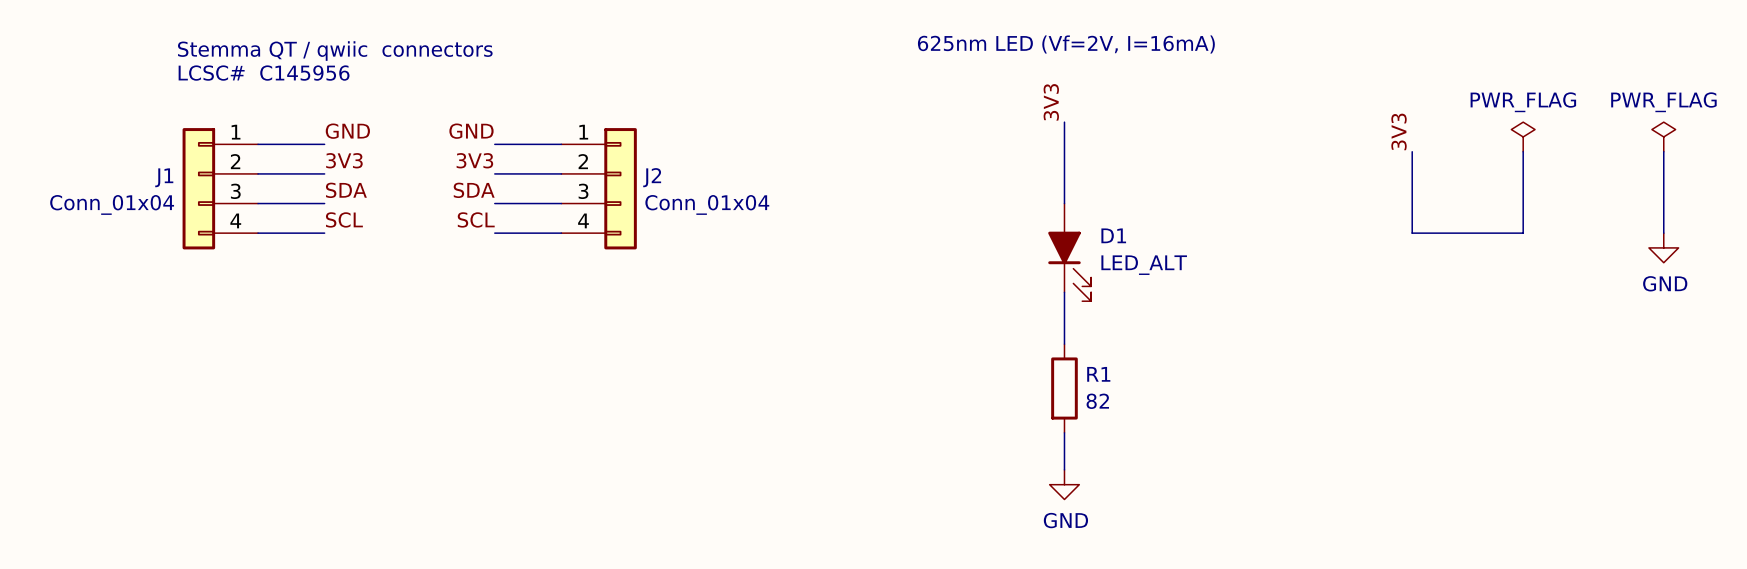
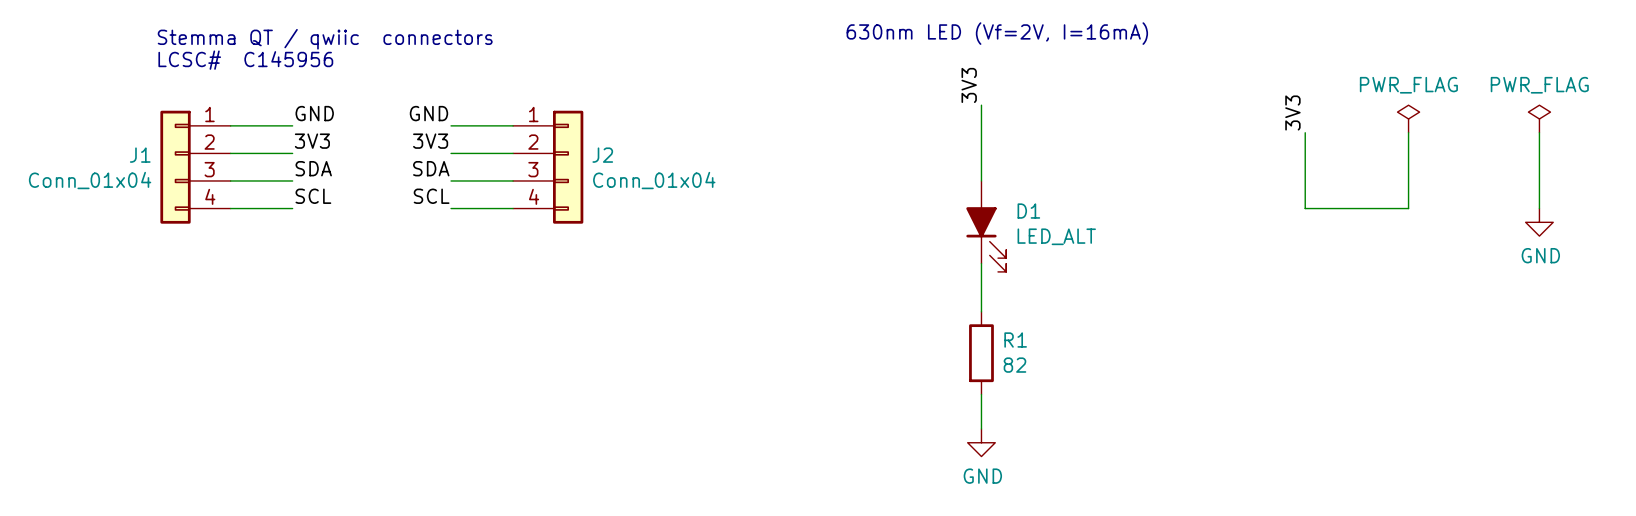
text: 625nm LED (Vf=2V, I=16mA) (1066, 44) -> 630nm LED (Vf=2V, I=16mA) (997, 33)

